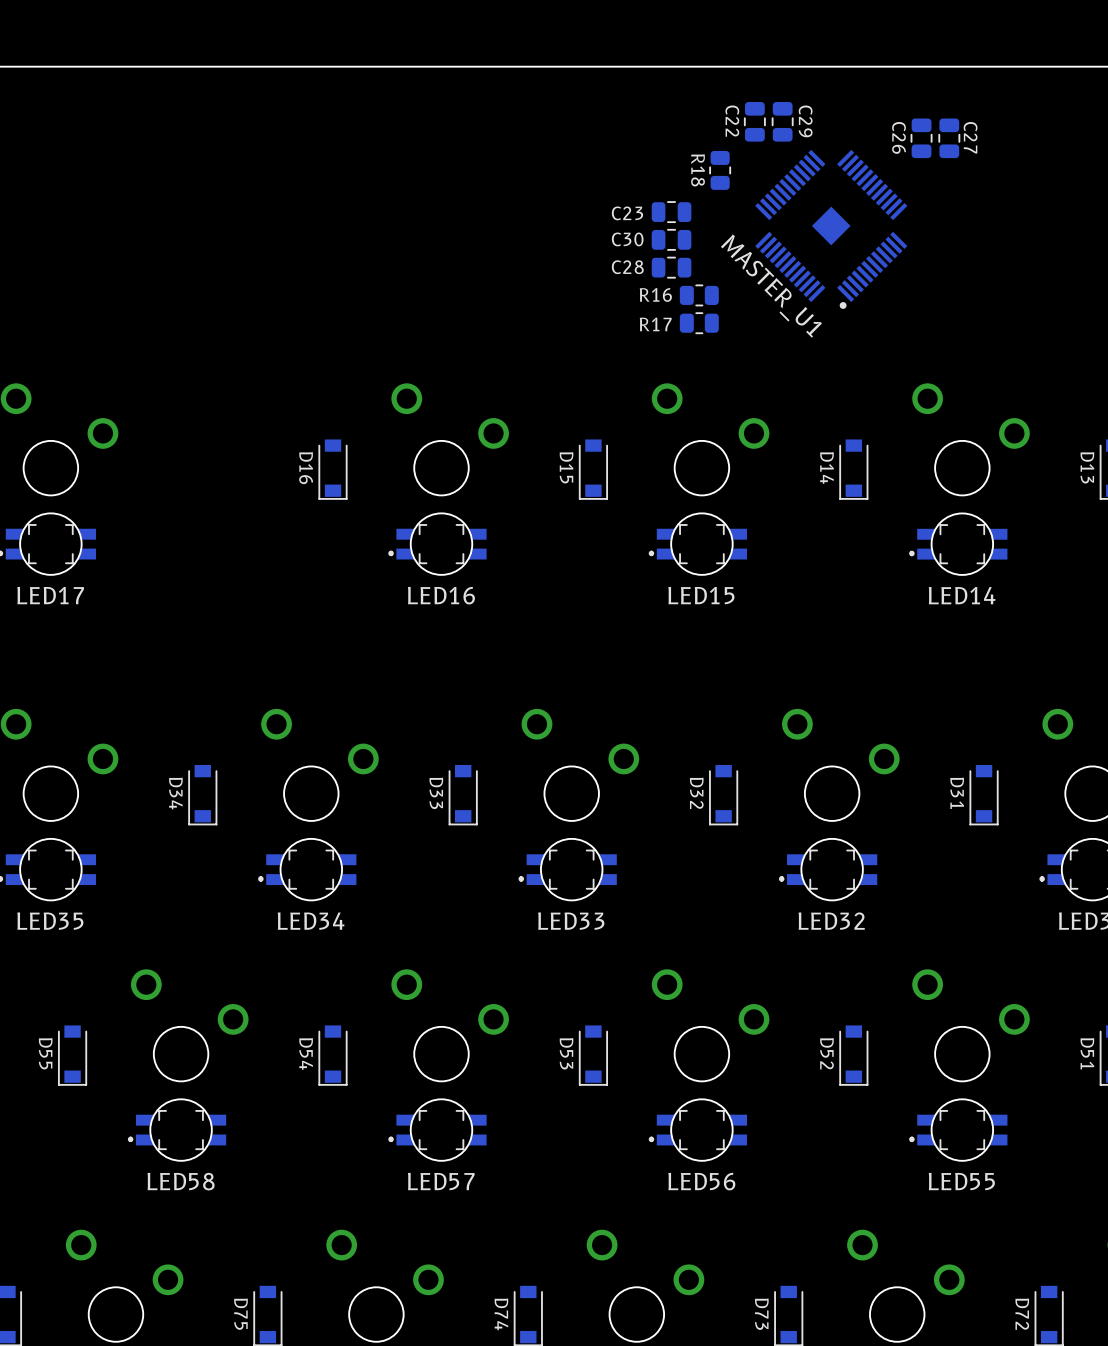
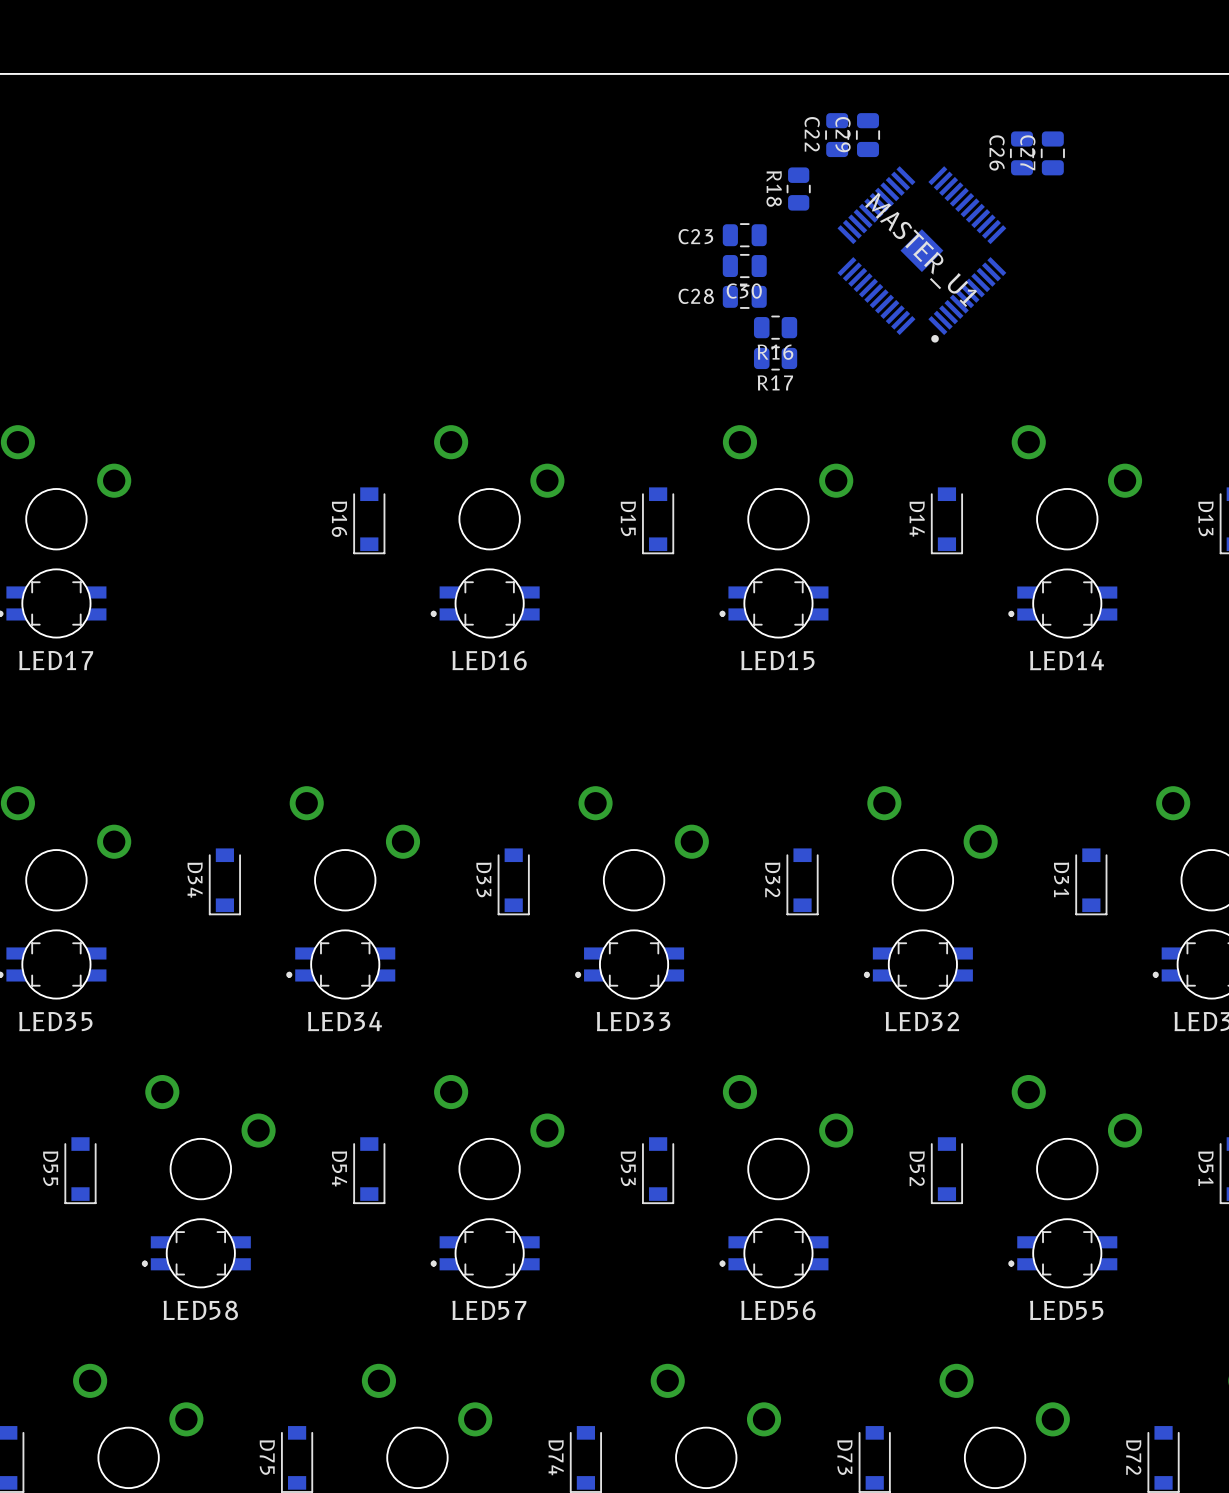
C29 name position: C29 (805, 121) -> C29 (842, 134)
C27 name position: C27 (970, 137) -> C27 (1027, 152)
C30 name position: C30 (627, 239) -> C30 (744, 291)
MASTER_U1 name position: MASTER_U1 (771, 286) -> MASTER_U1 (921, 249)
R16 name position: R16 (655, 294) -> R16 (775, 352)
R17 name position: R17 (655, 324) -> R17 (775, 382)

